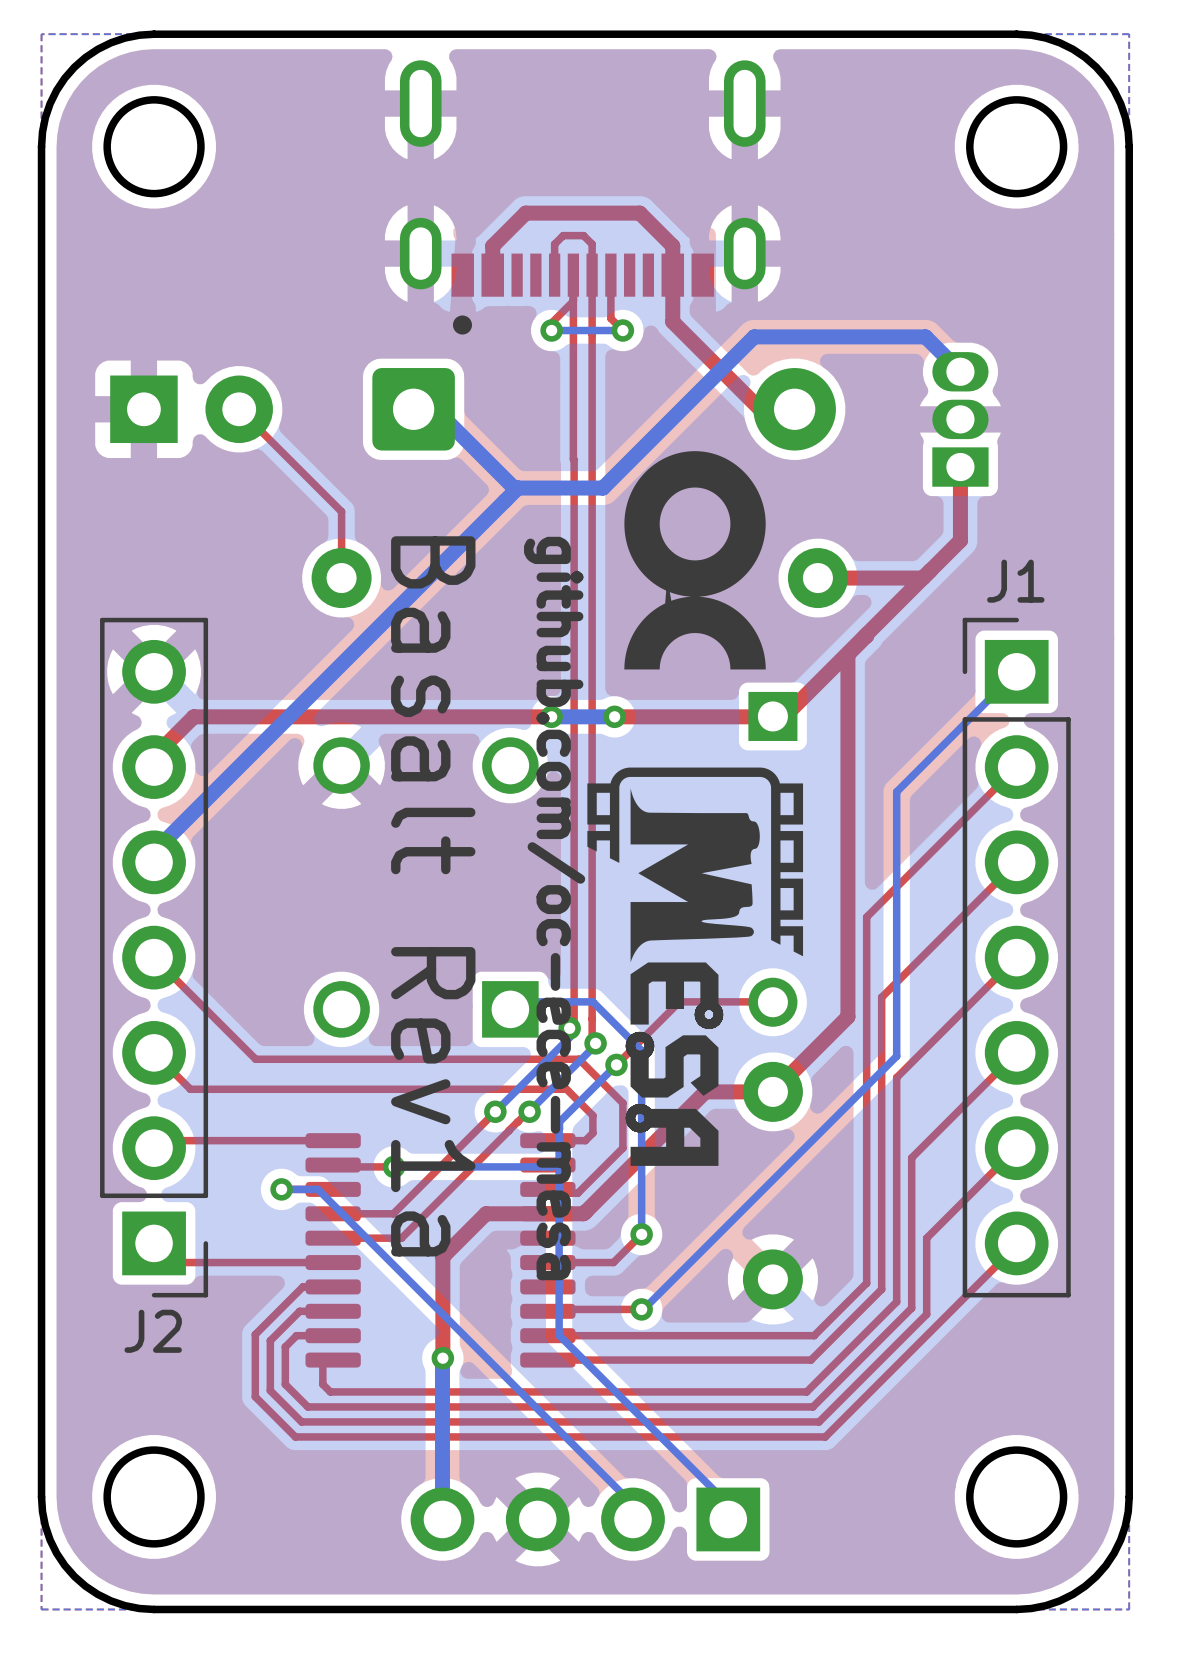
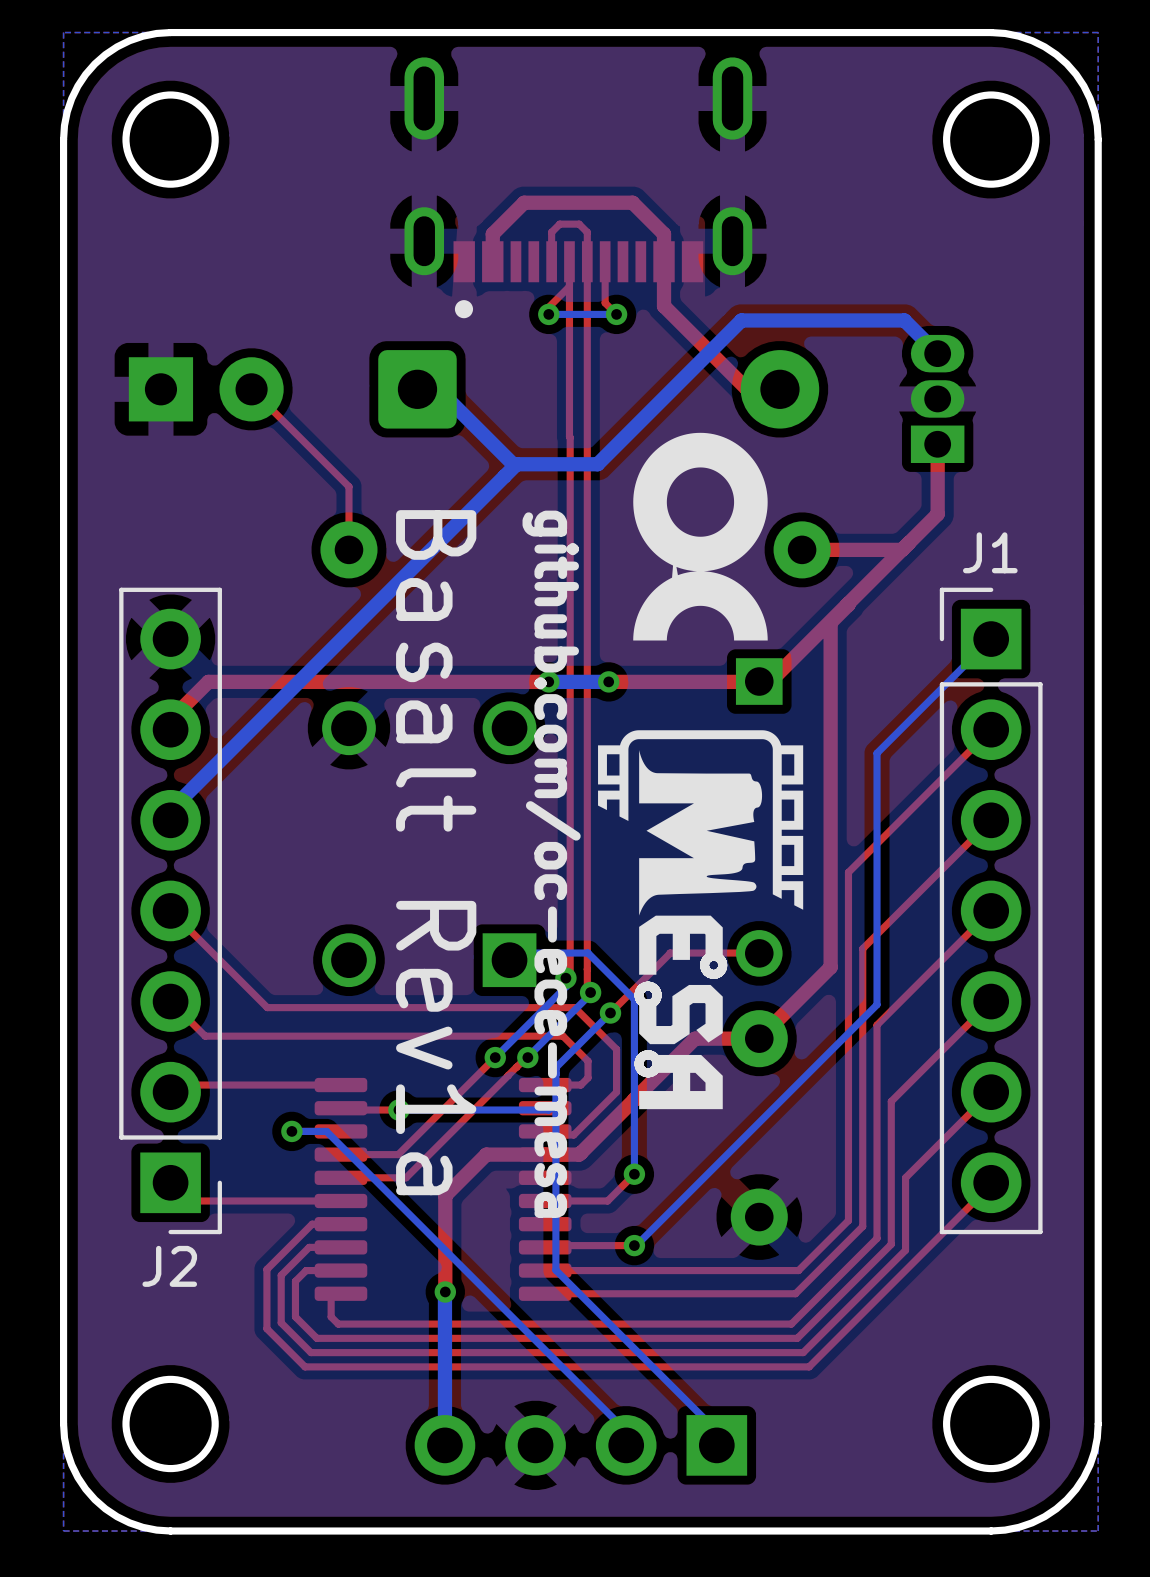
drawing position: (695, 560) -> (700, 536)
drawing position: (695, 861) -> (700, 820)
drawing position: (695, 875) -> (700, 832)
drawing position: (674, 993) -> (680, 945)
drawing position: (674, 1066) -> (680, 1014)
drawing position: (674, 1137) -> (680, 1082)

